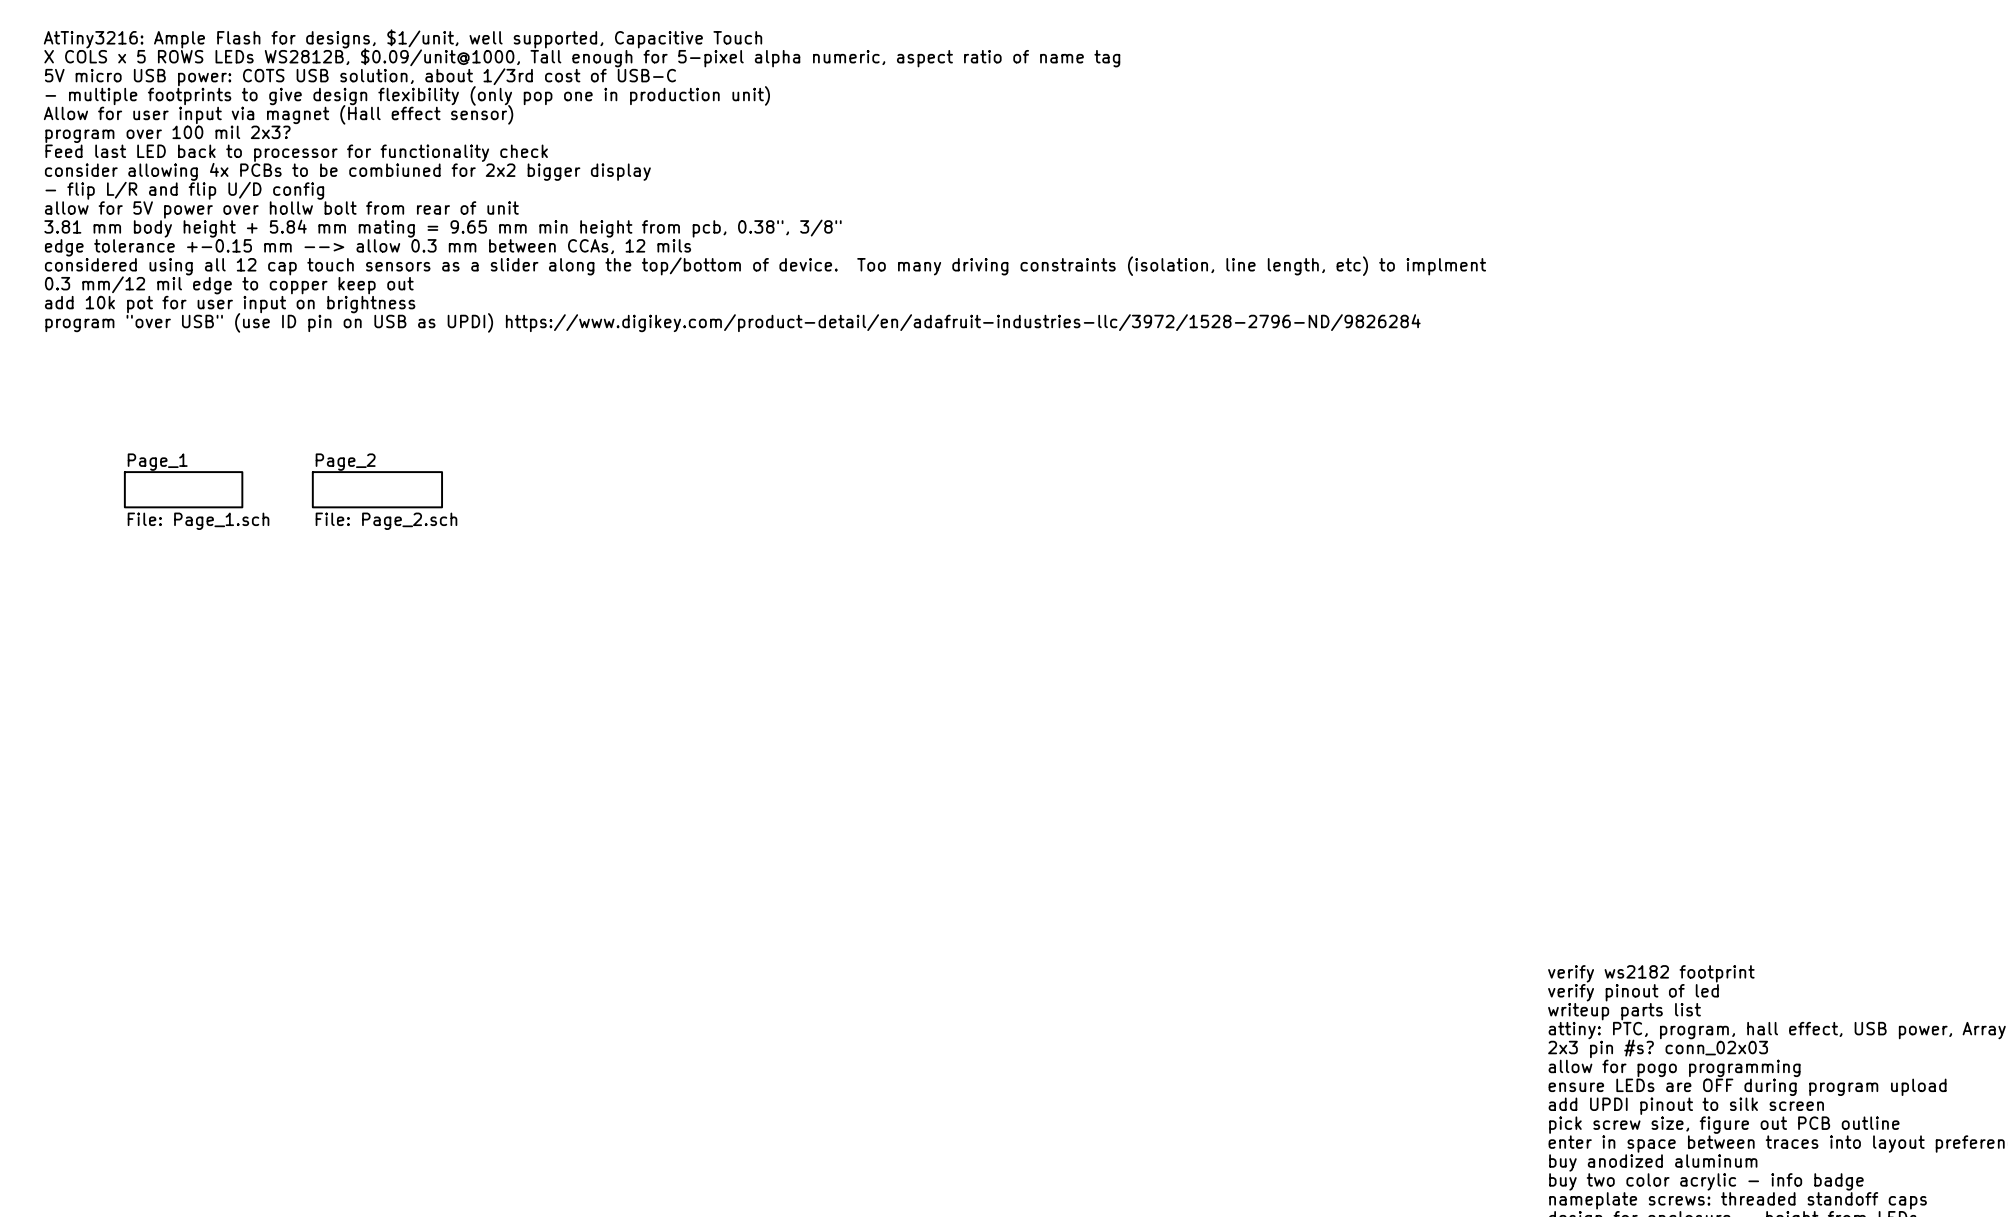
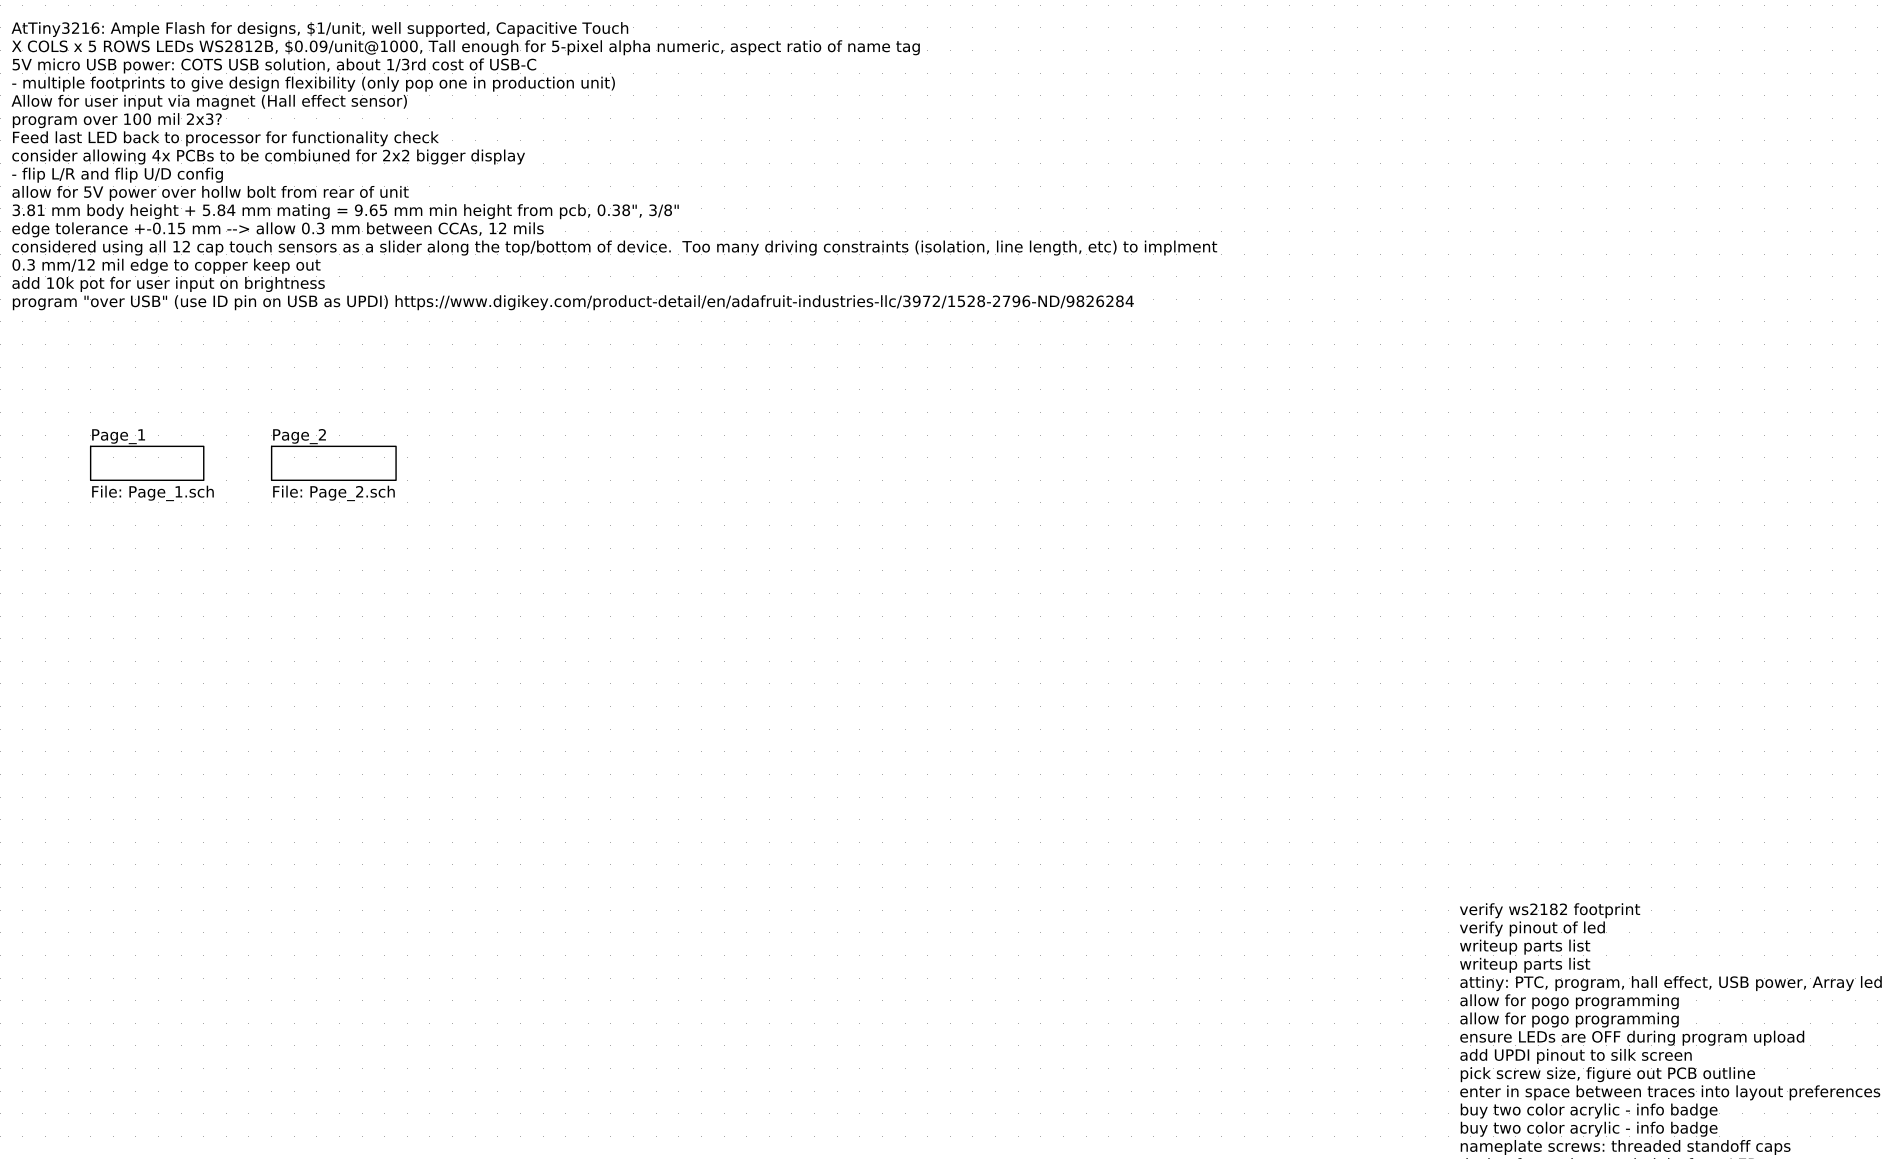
text: none -> verify ws2182 footprint (1550, 910)
text: verify ws2182 footprint (1651, 973) -> verify pinout of led (1532, 928)
text: verify pinout of led (1633, 992) -> writeup parts list (1525, 947)
text: 2x3 pin #s? conn_02x03 (1658, 1048) -> allow for pogo programming (1569, 1001)
text: buy anodized aluminum (1653, 1162) -> buy two color acrylic - info badge (1589, 1111)

